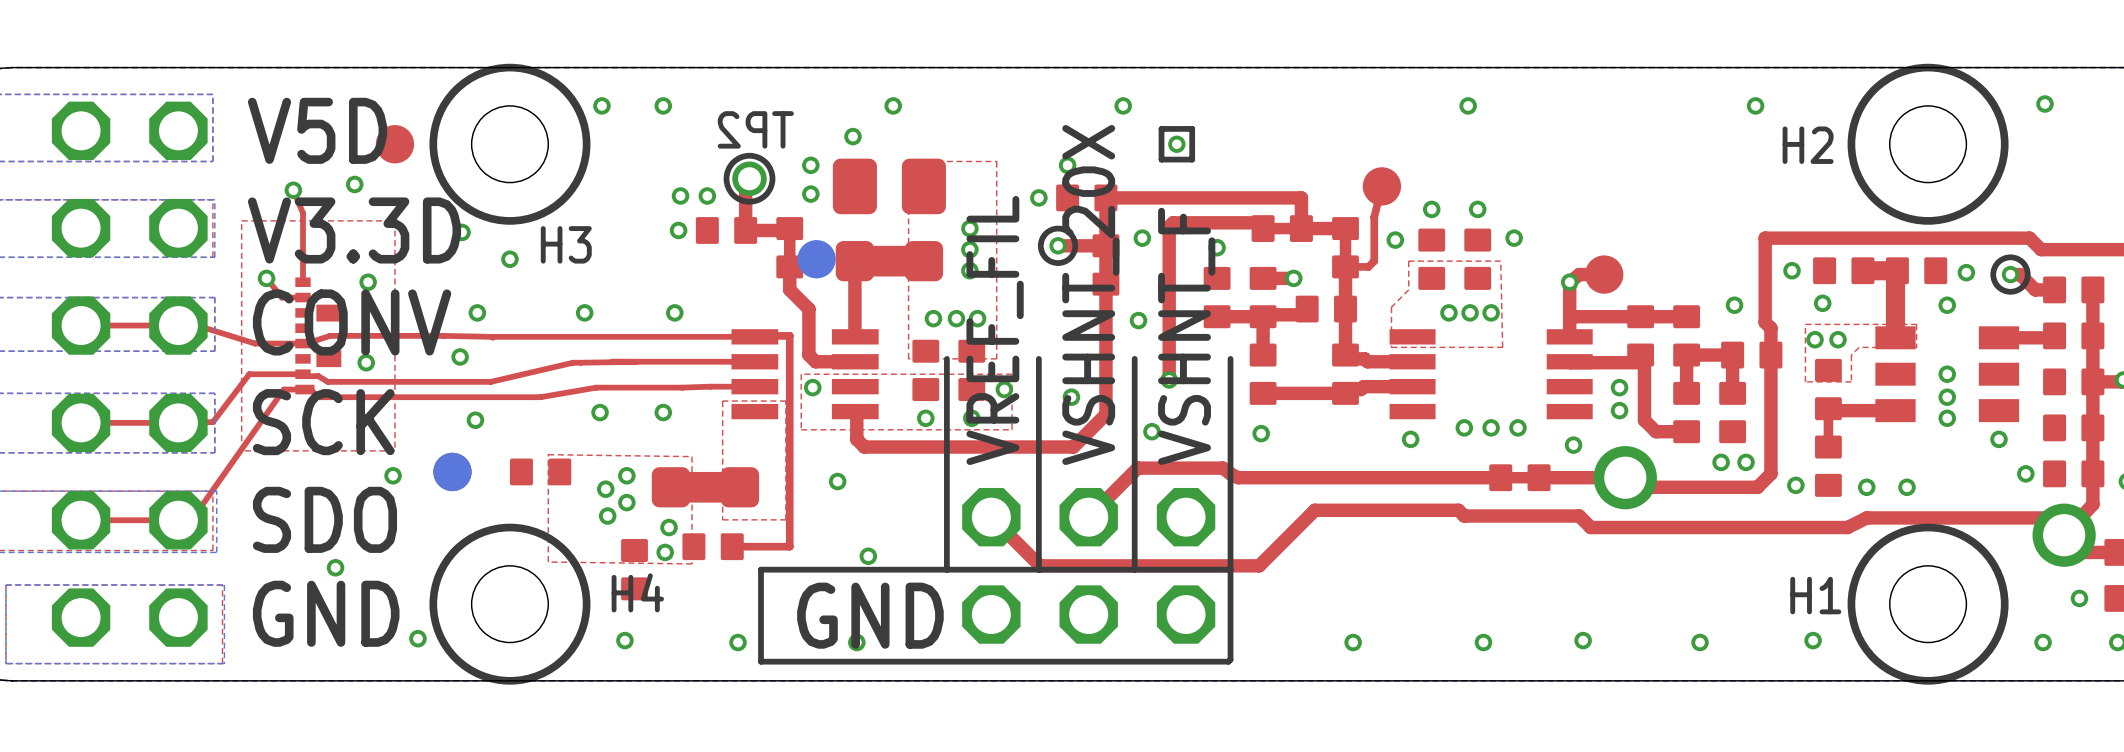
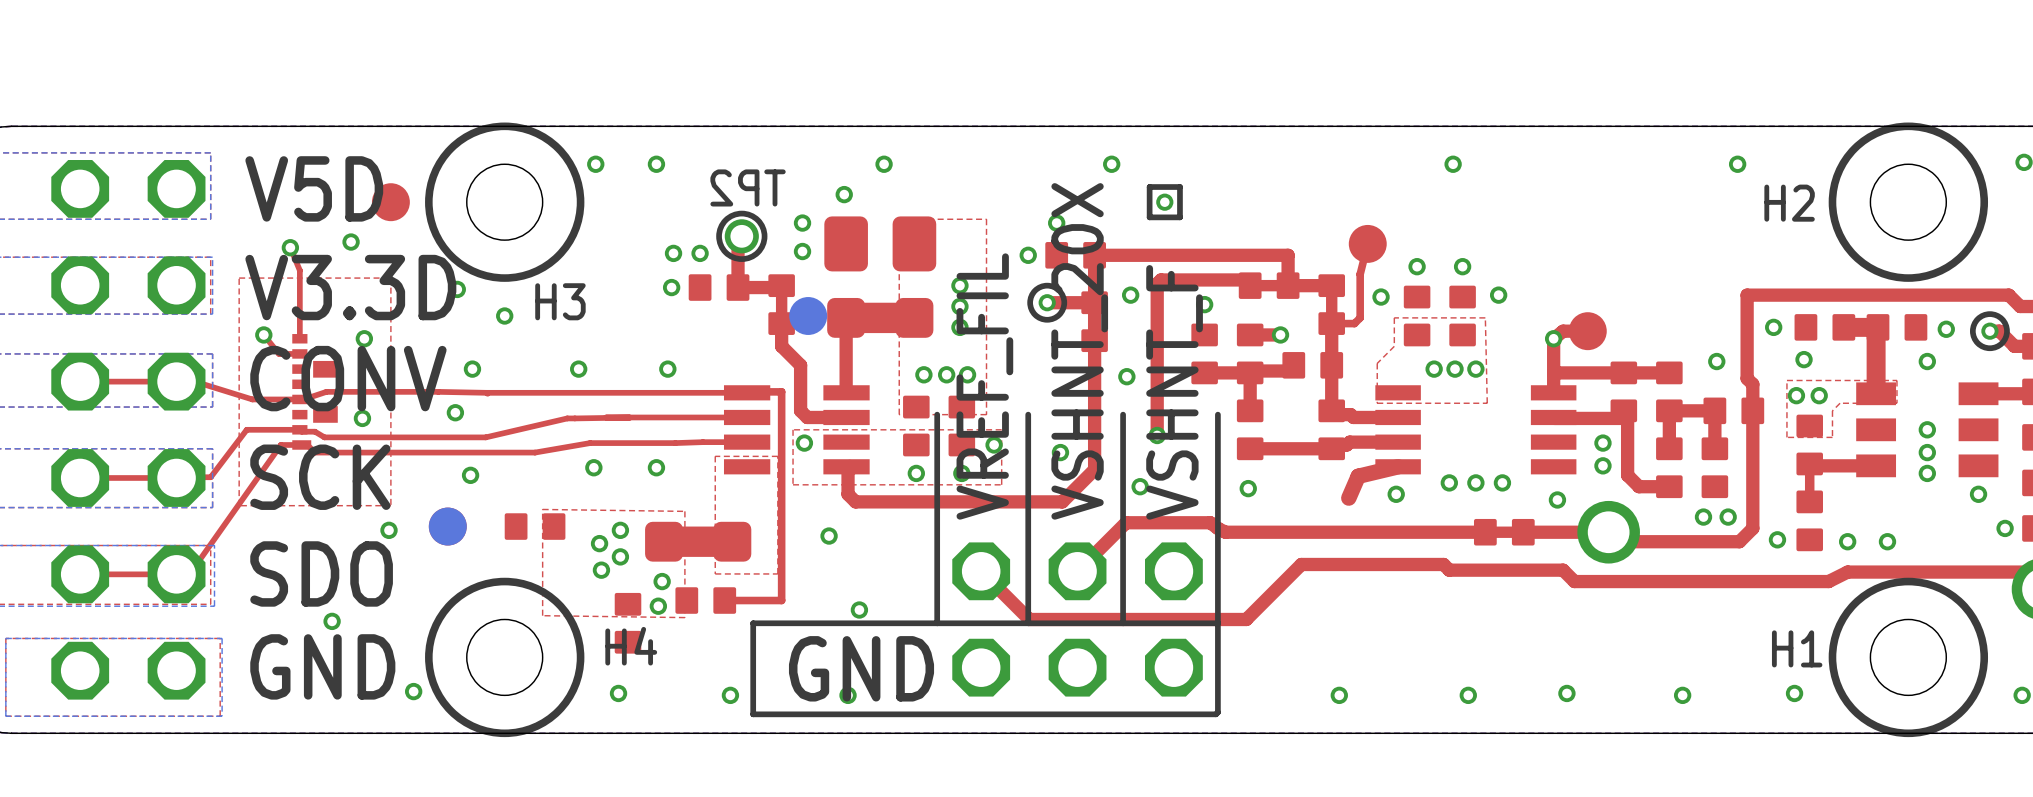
top track: none -> (1398, 466) (1358, 476) (1348, 498)

